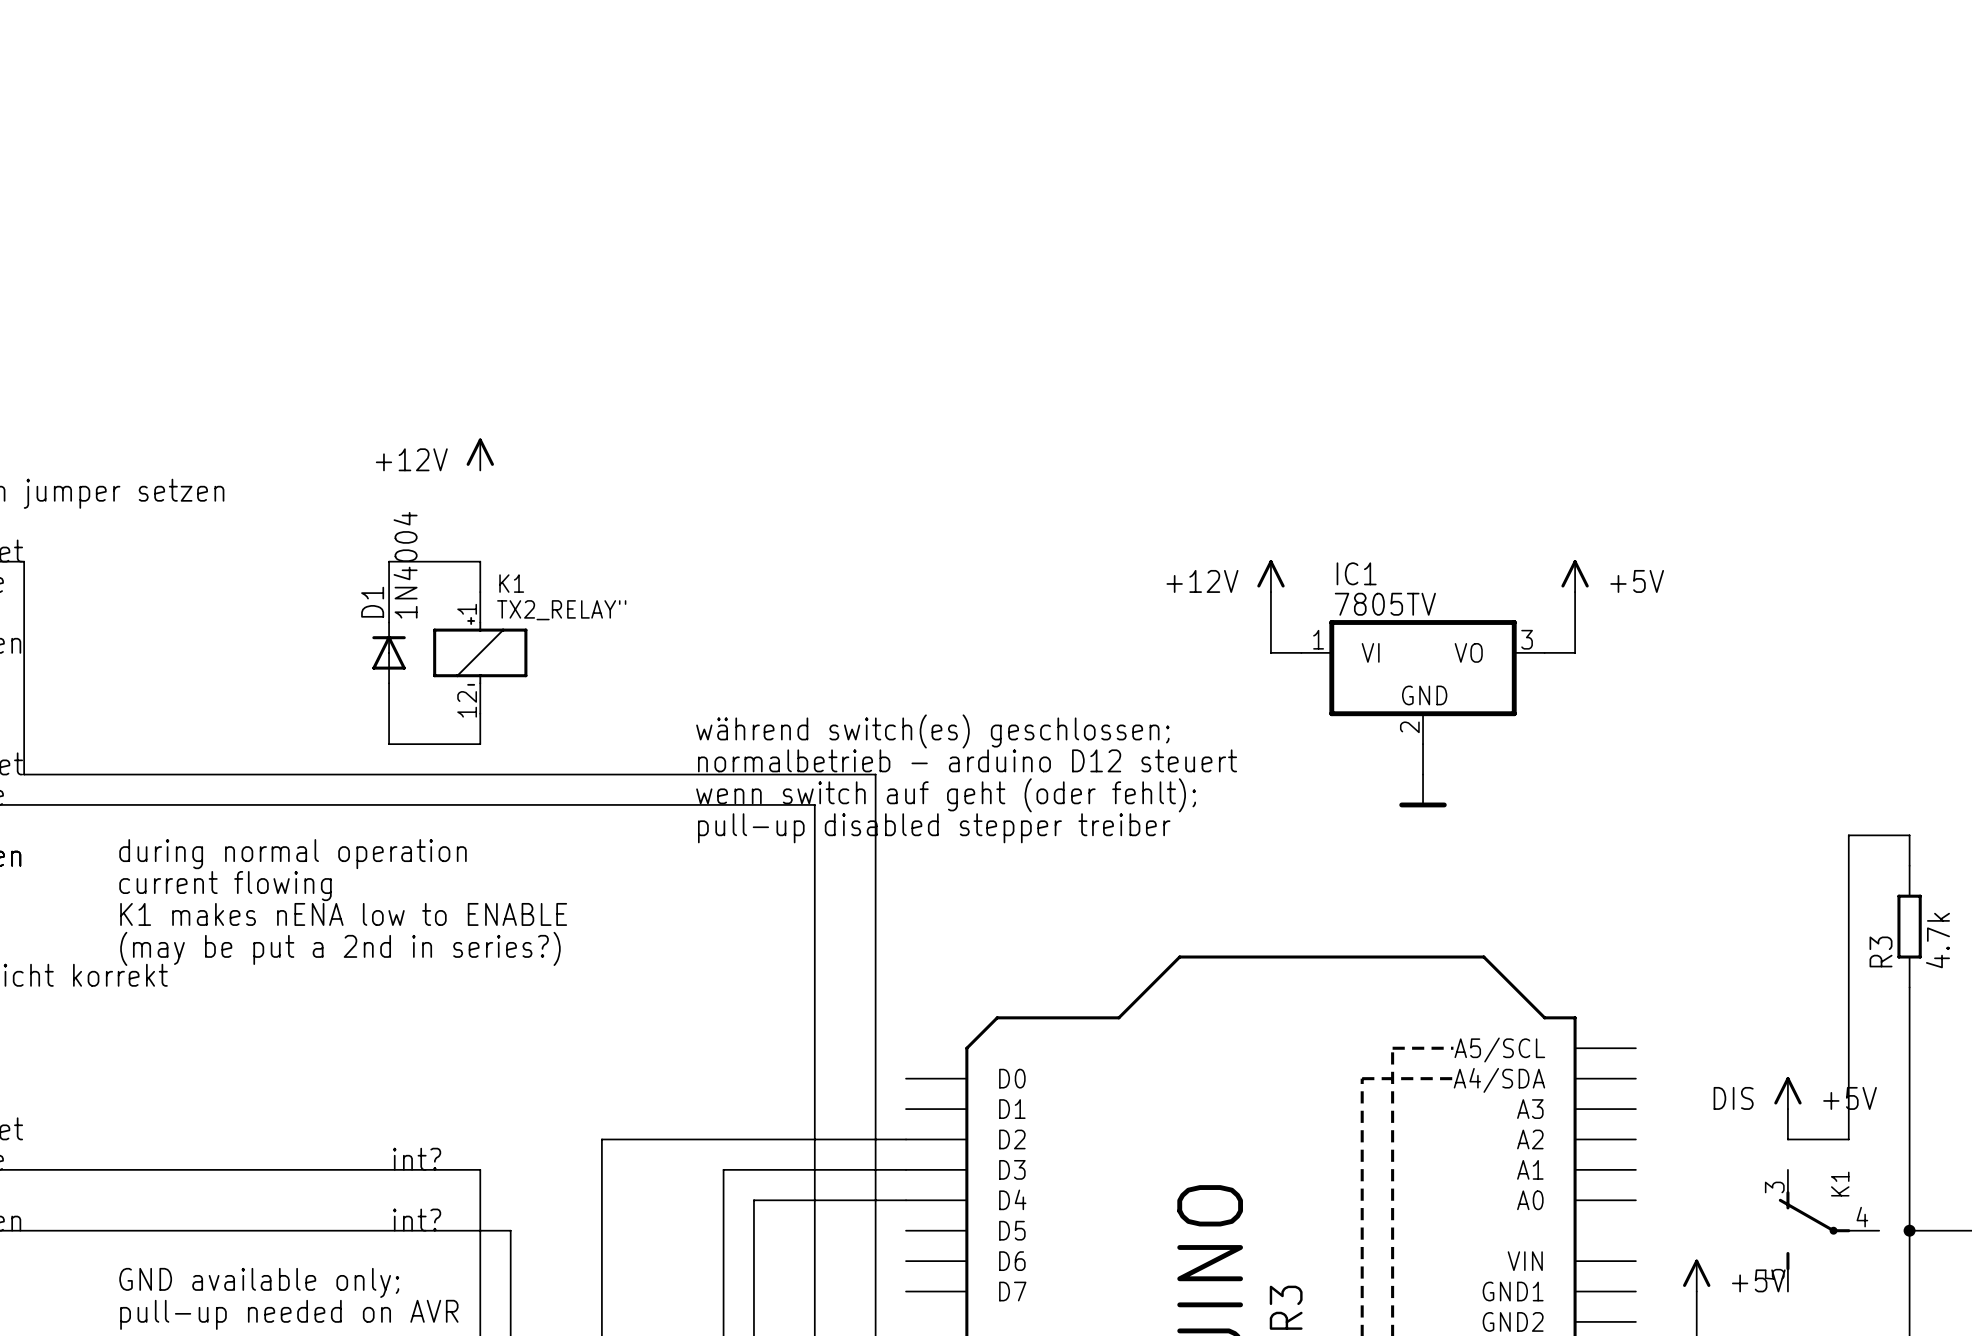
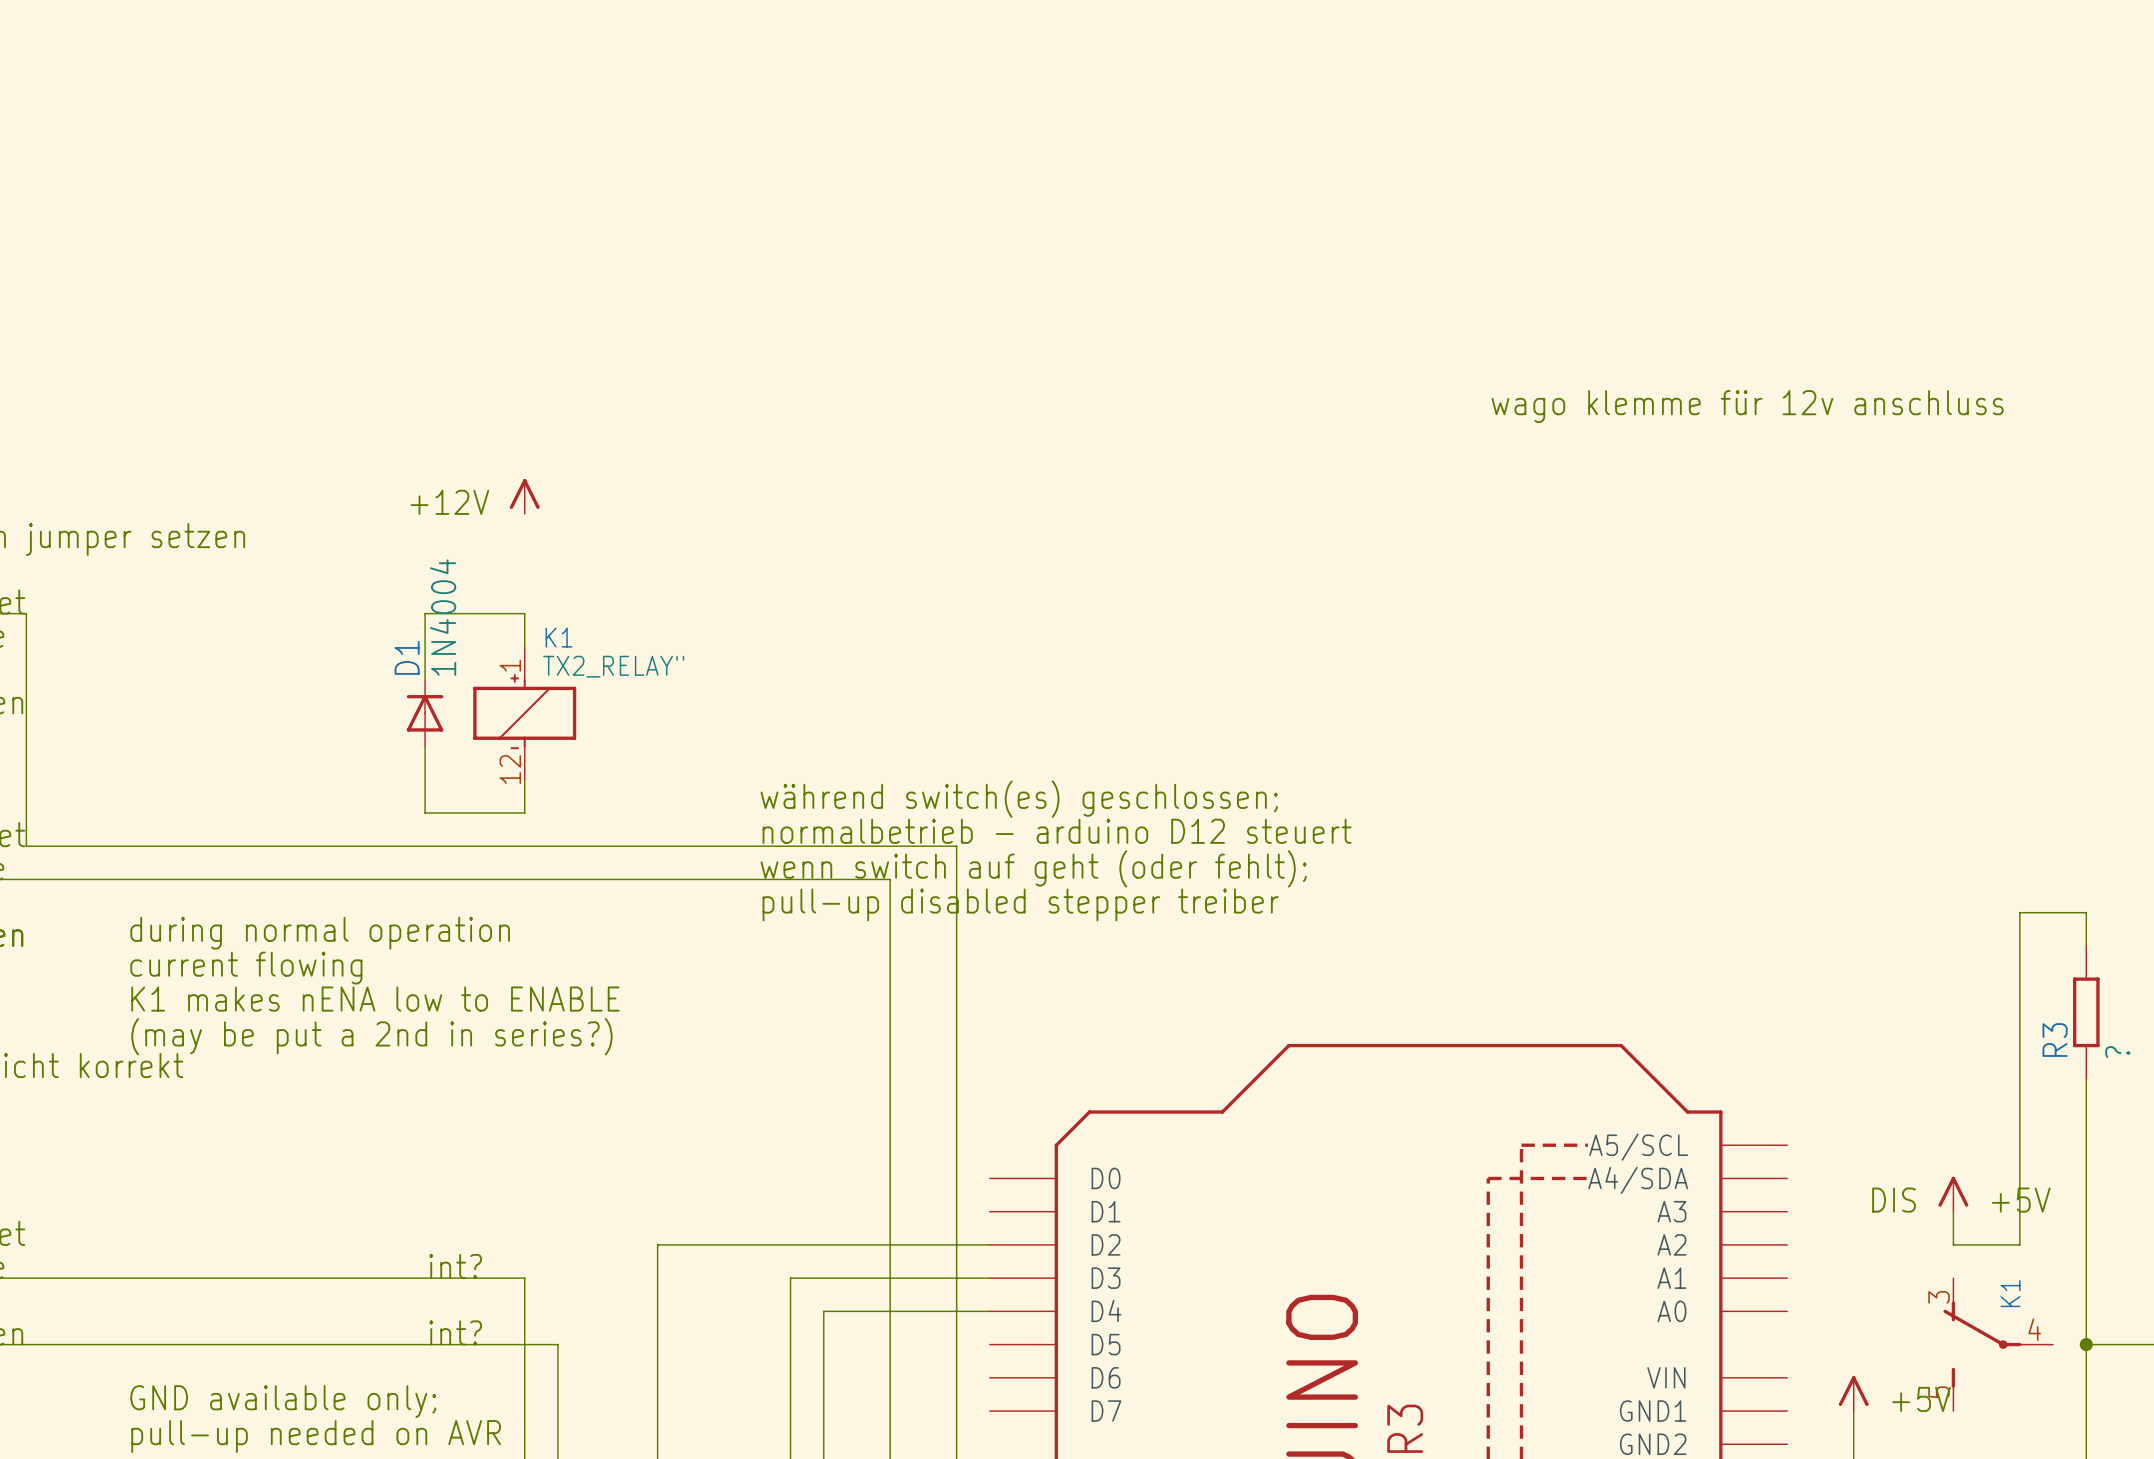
text: none -> wago klemme für 12v anschluss (1747, 406)
power symbol: (1270, 576) -> none
power symbol: (1575, 576) -> none
text: +12V (1202, 581) -> none
text: +5V (1637, 581) -> none
wire: (1270, 592) (1270, 652) (1301, 652) -> none
wire: (1575, 592) (1575, 652) (1544, 652) -> none
IC1: 7805TV (1423, 682) -> none
wire: (1423, 744) (1423, 774) -> none
power symbol: (1423, 790) -> none
R3 value: 4.7k (1937, 940) -> ? (2117, 1051)

